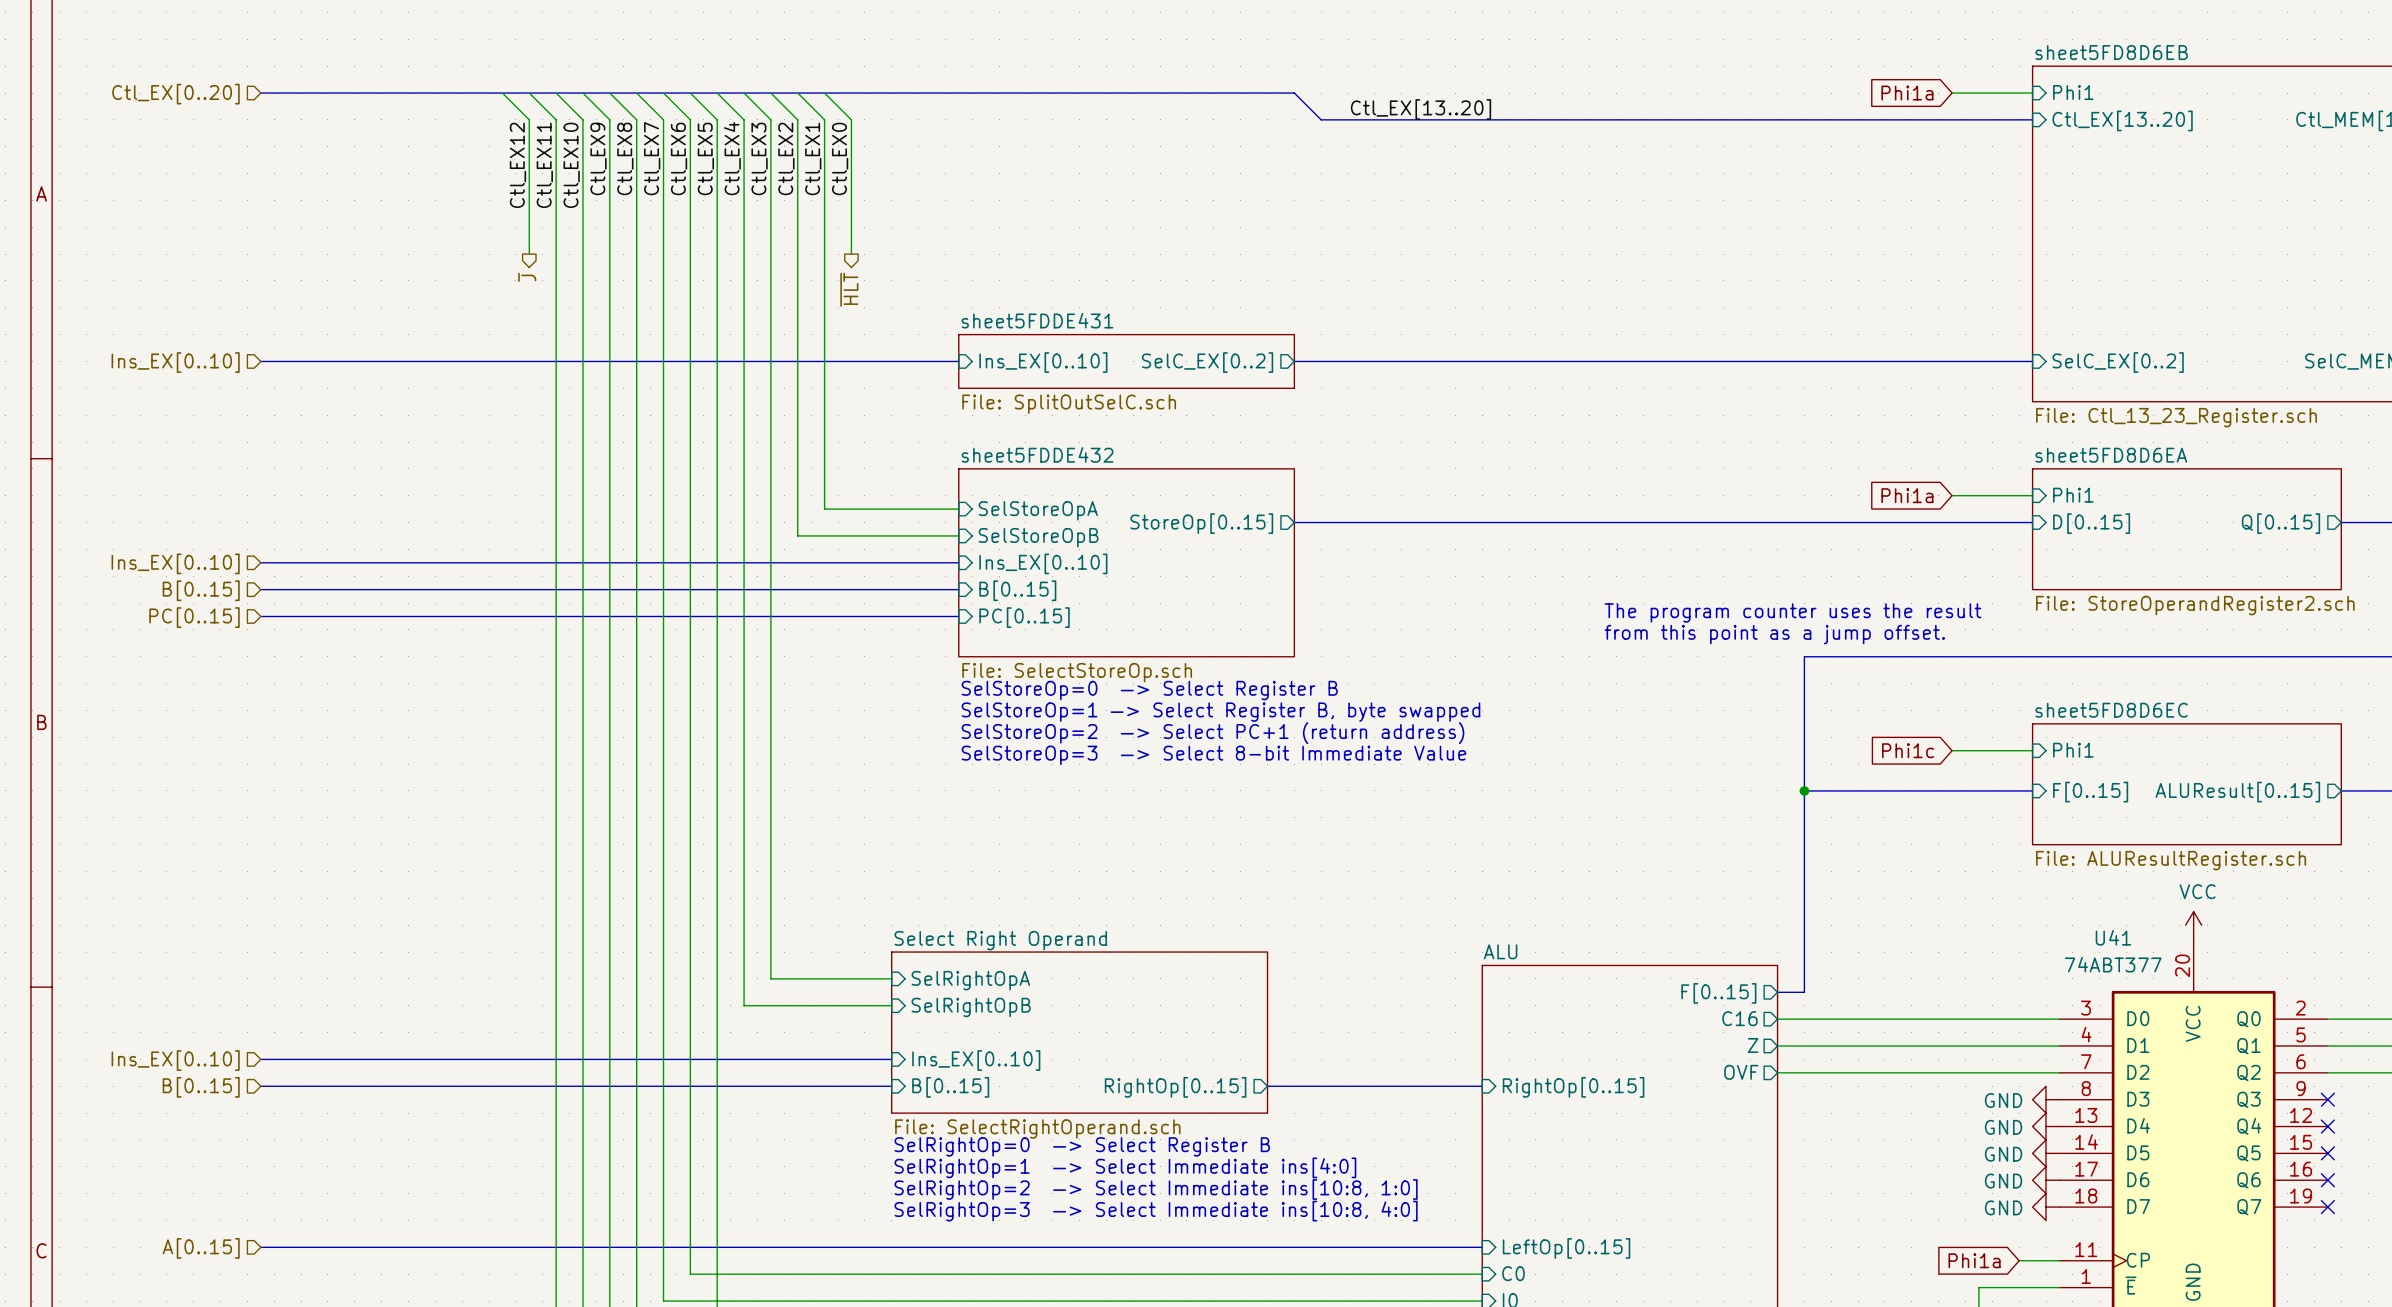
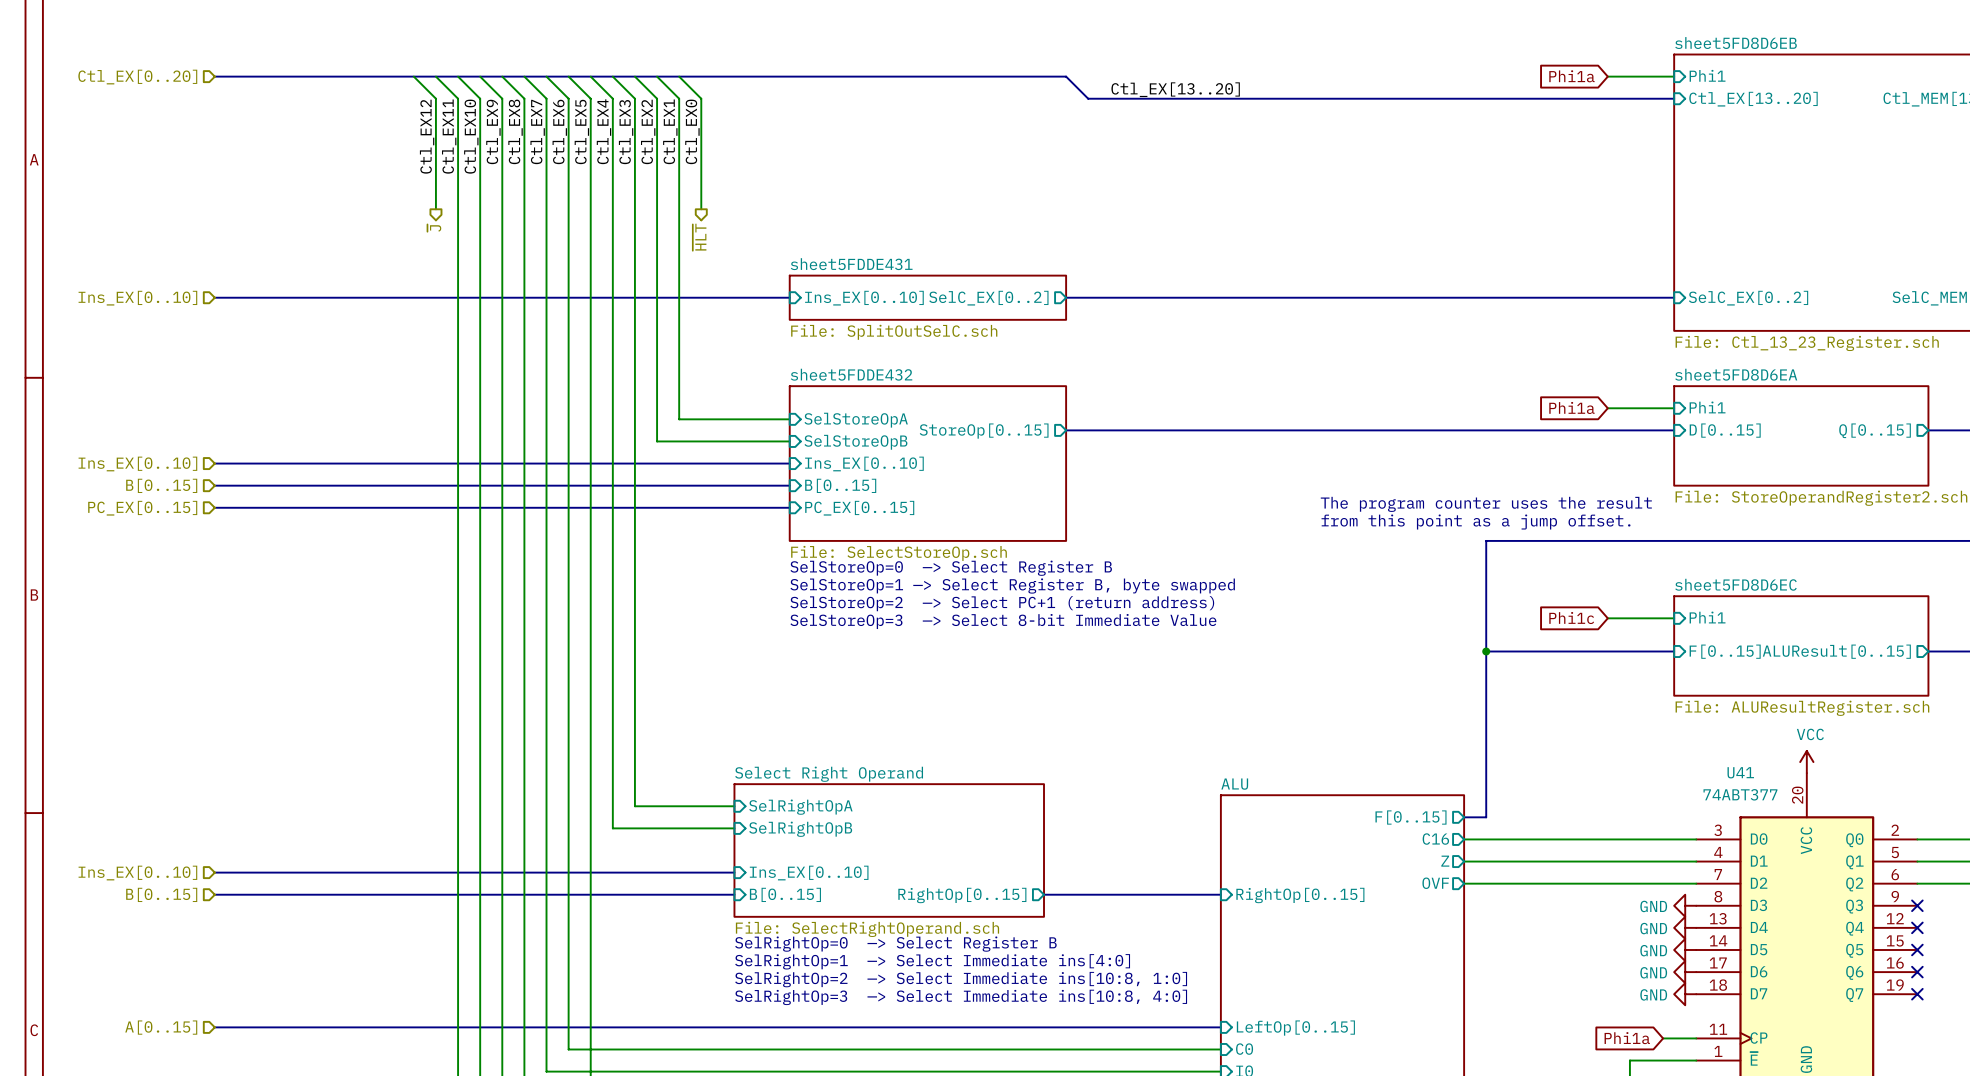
hierarchical label: PC[0..15] (194, 617) -> PC_EX[0..15] (142, 508)
sheet pin: PC[0..15] (1024, 617) -> PC_EX[0..15] (859, 508)

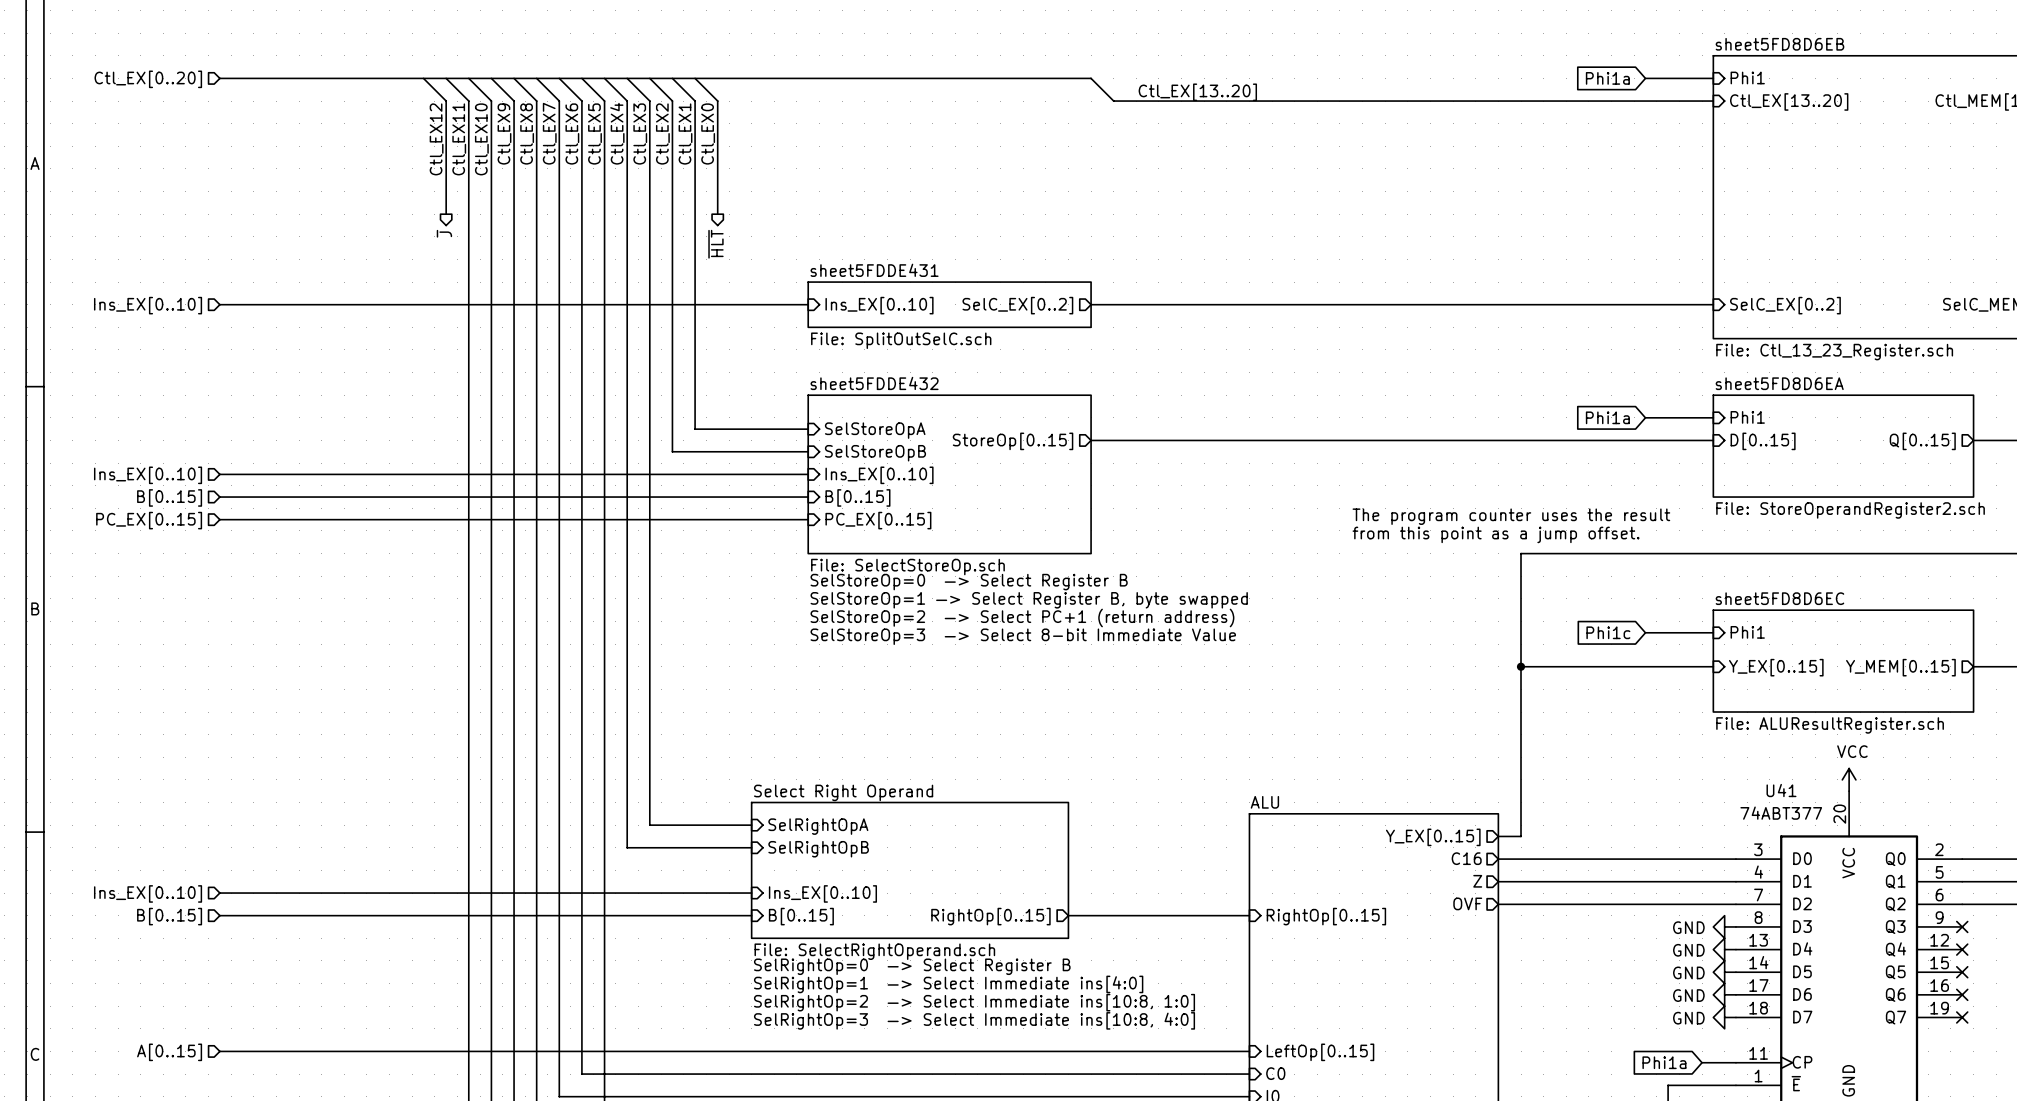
sheet pin: F[0..15] (1725, 651) -> Y_EX[0..15] (1776, 667)
sheet pin: ALUResult[0..15] (1836, 651) -> Y_MEM[0..15] (1900, 667)
sheet pin: F[0..15] (1410, 817) -> Y_EX[0..15] (1433, 837)

